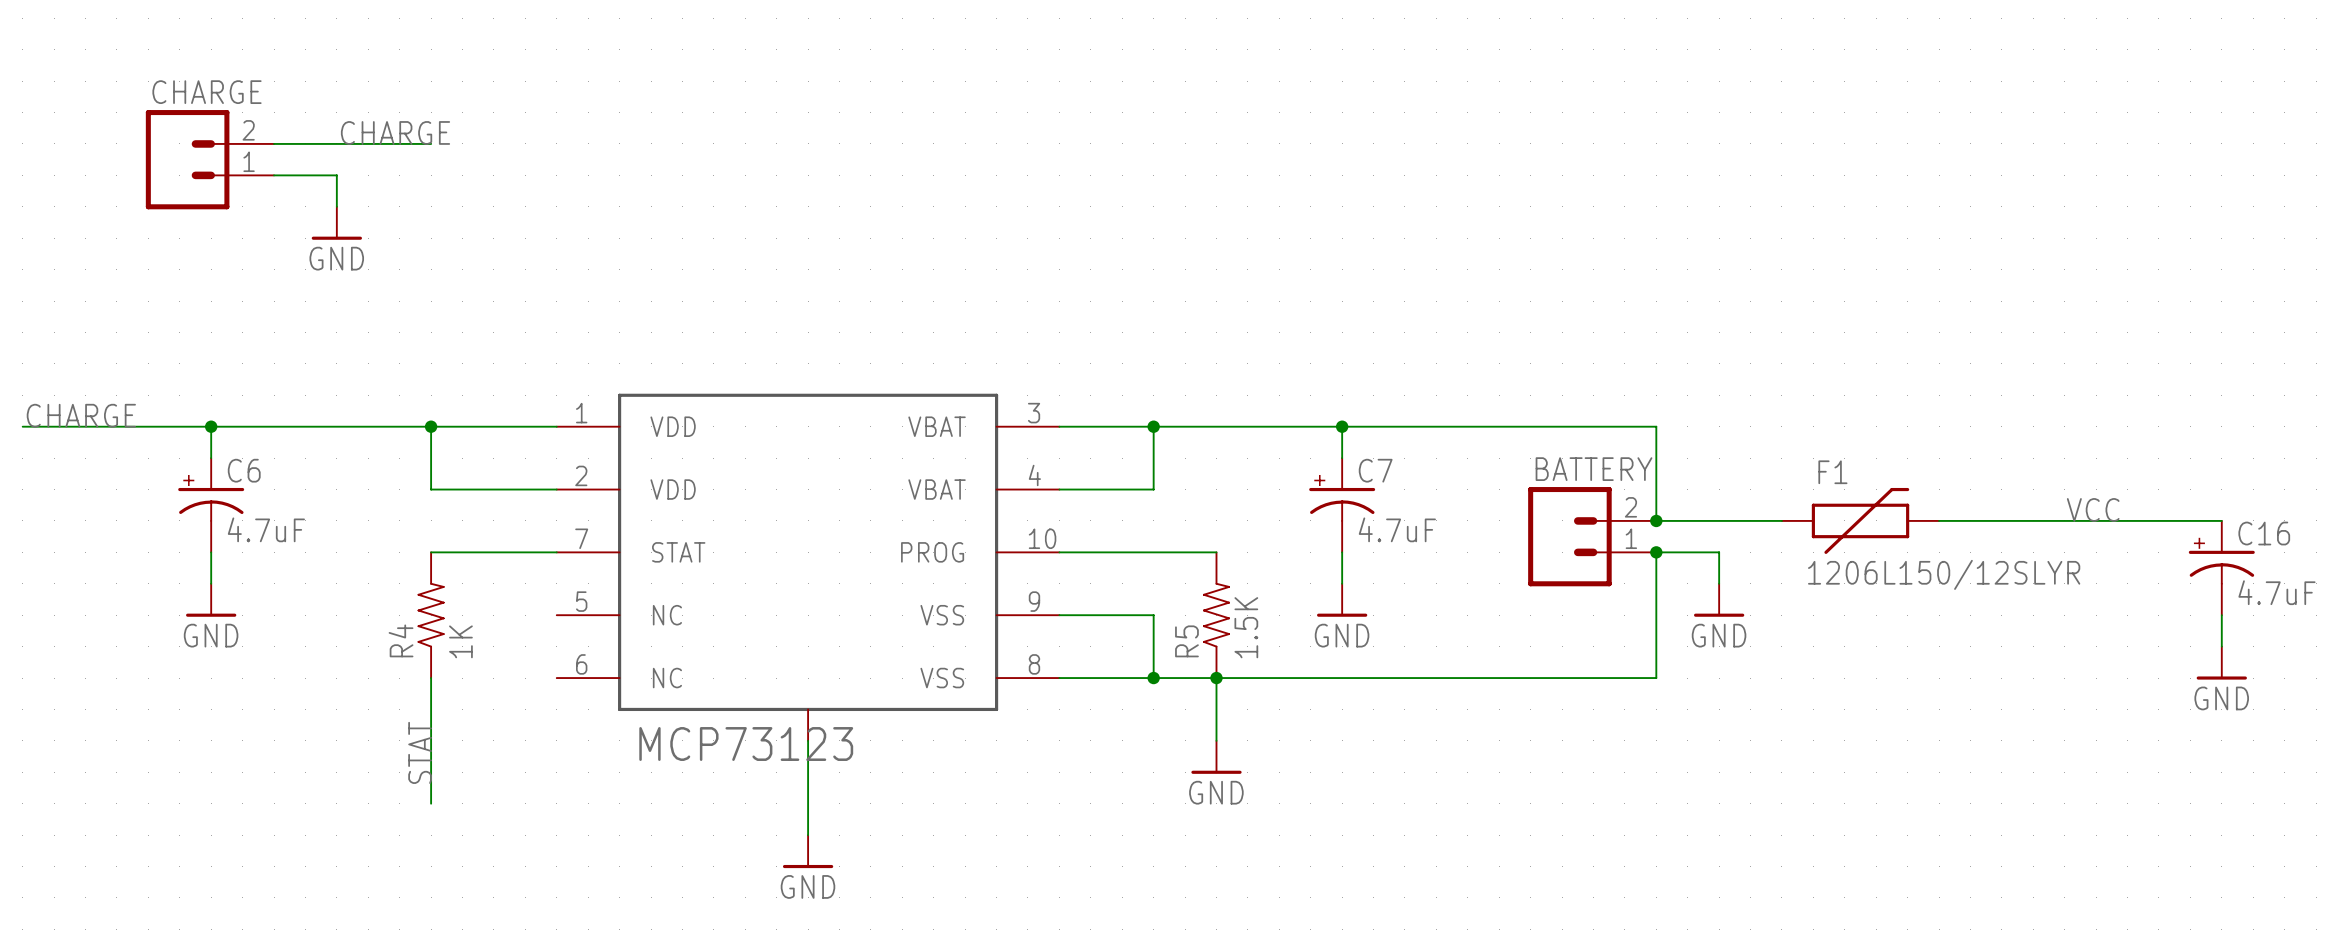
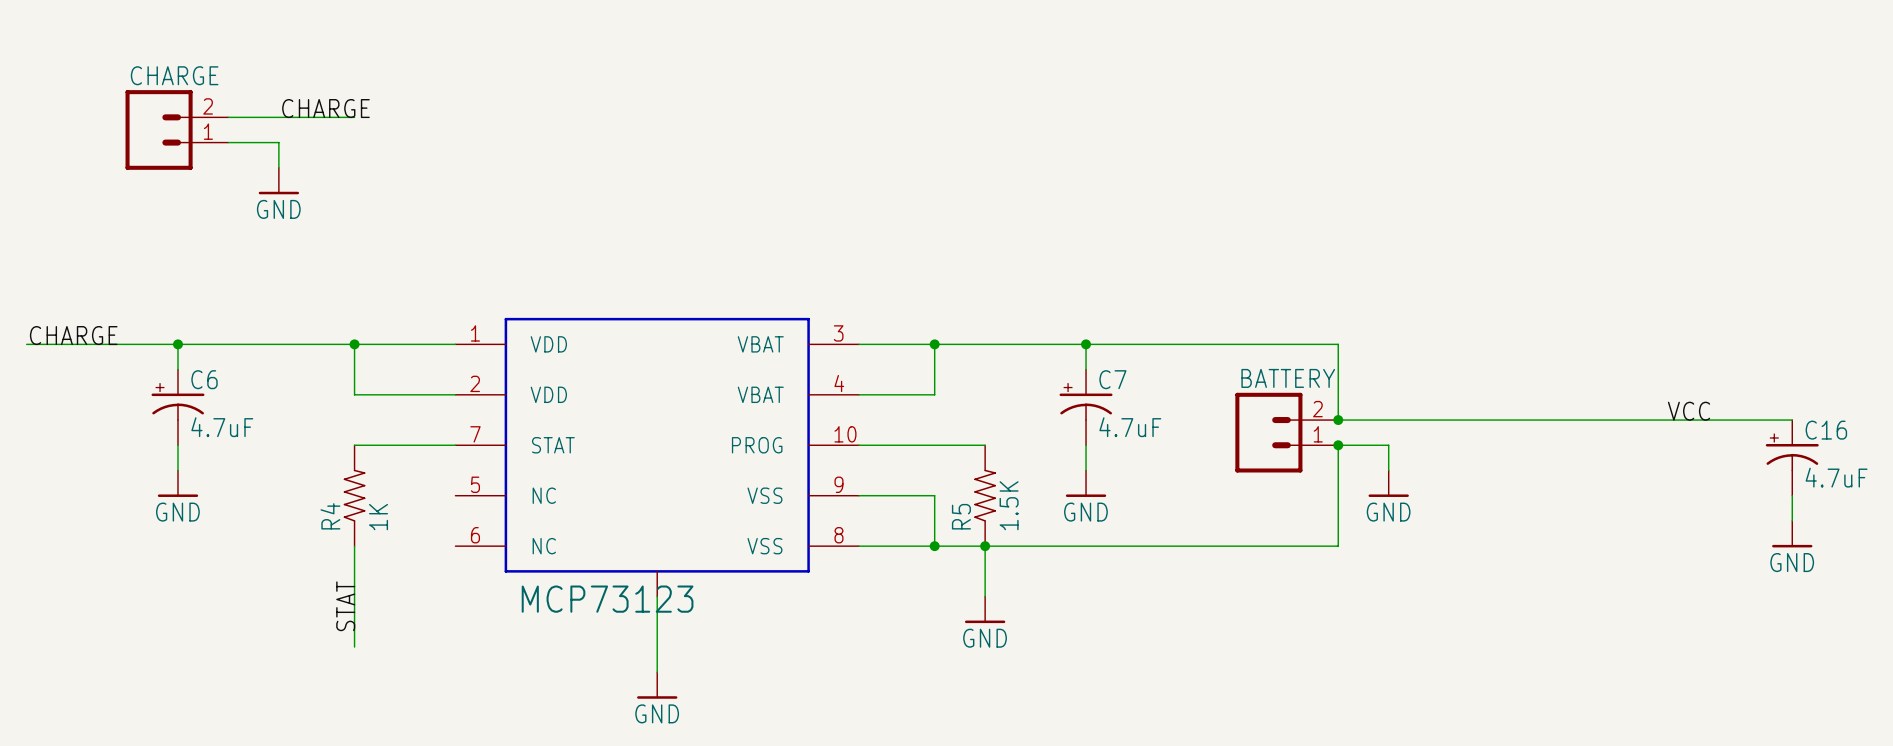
wire: none -> (1439, 420) (1565, 420)
F1: 1206L150/12SLYR (1860, 520) -> none

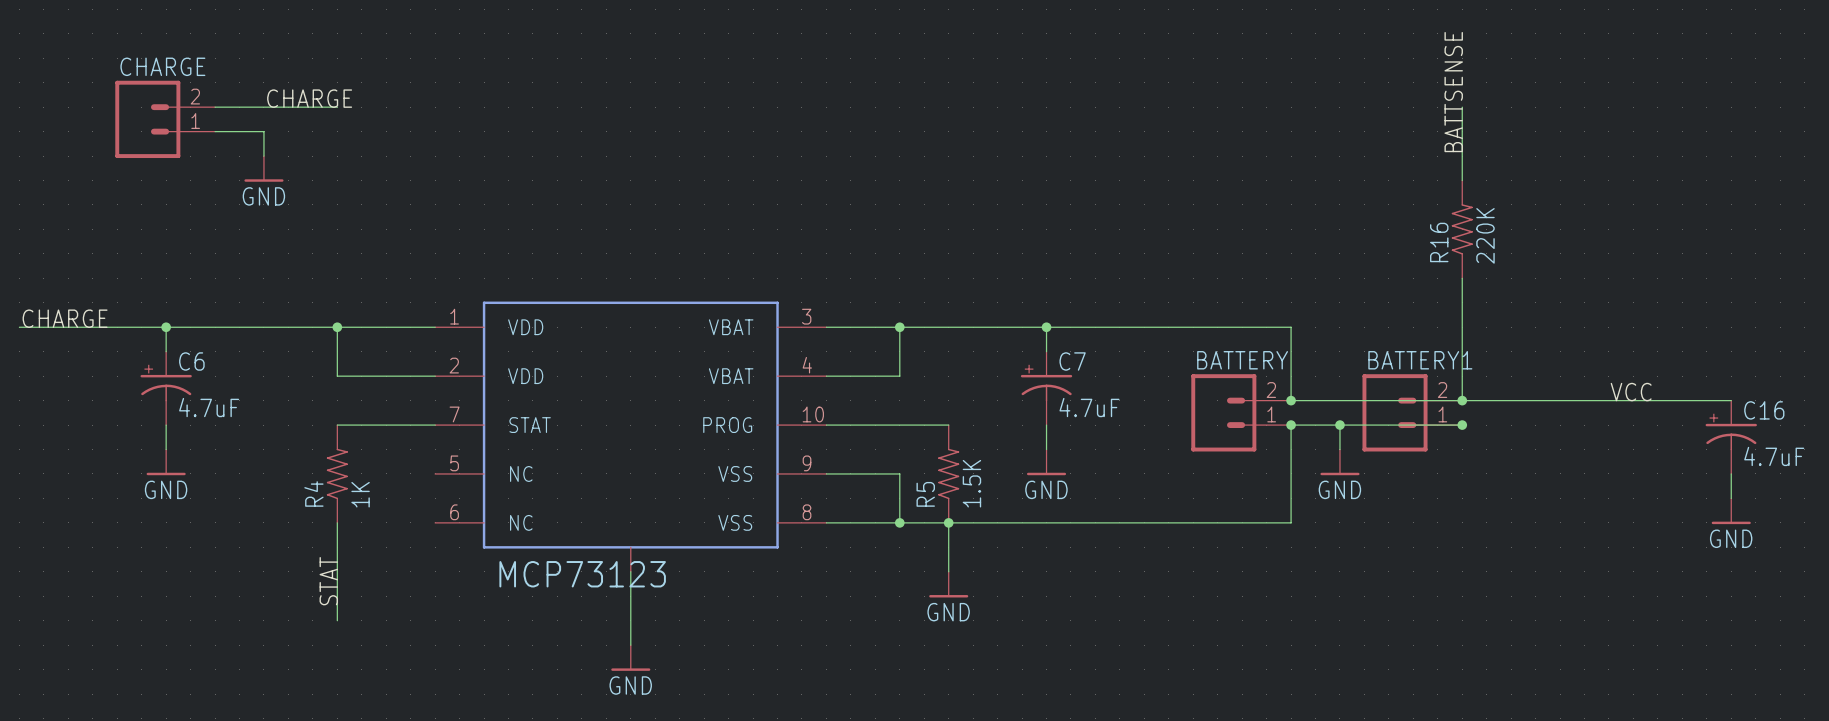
label: none -> BATTSENSE (1453, 92)
wire: none -> (1462, 107) (1462, 180)
R16: none -> 220K (1462, 229)
wire: none -> (1462, 278) (1462, 400)
junction: none -> (1462, 400)
BATTERY1: none -> (1412, 412)
wire: none -> (1339, 425) (1462, 425)
junction: none -> (1339, 425)
junction: none -> (1462, 425)

